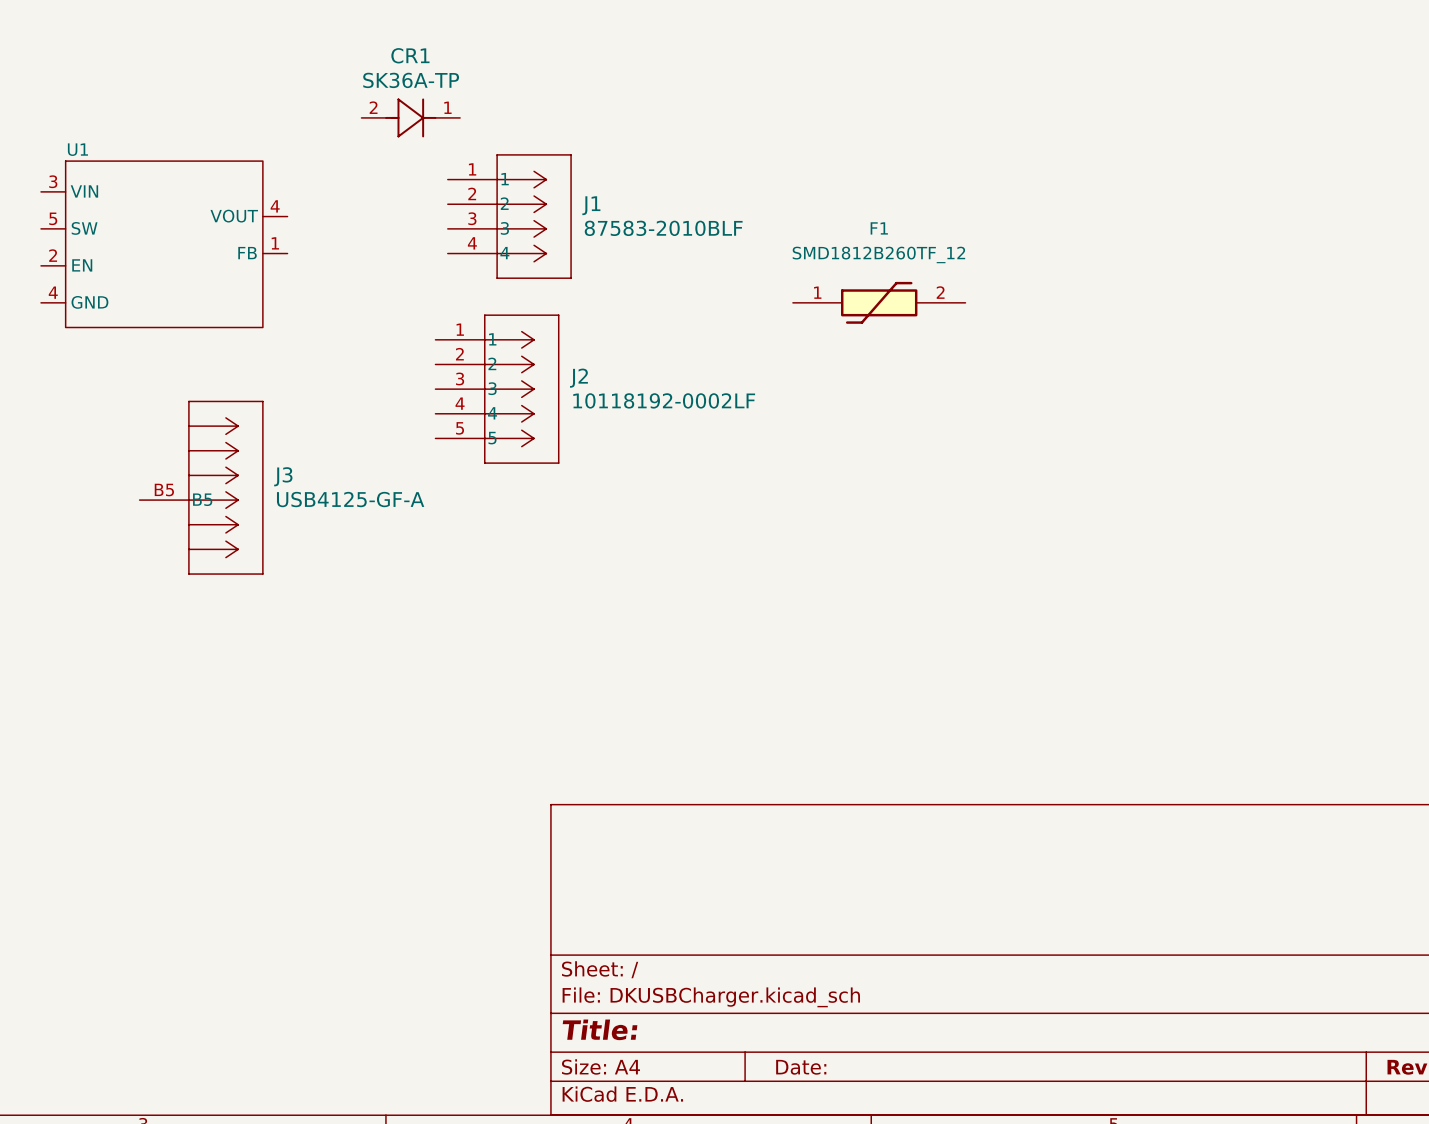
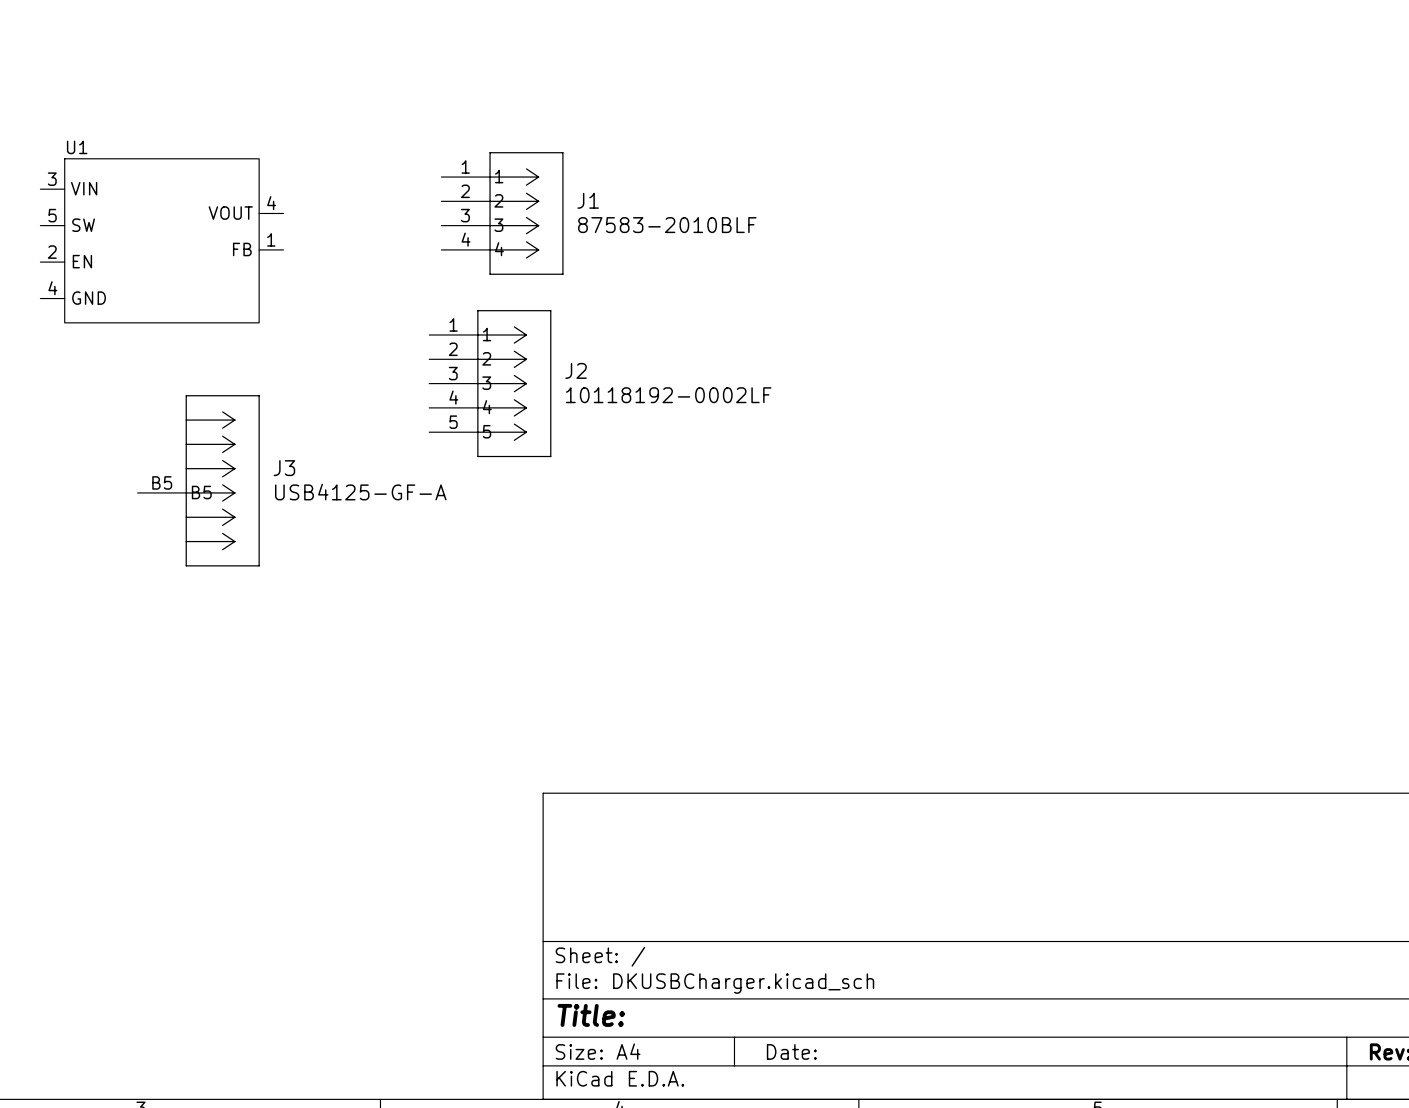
CR1: SK36A-TP (410, 117) -> none
F1: SMD1812B260TF_12 (879, 302) -> none

